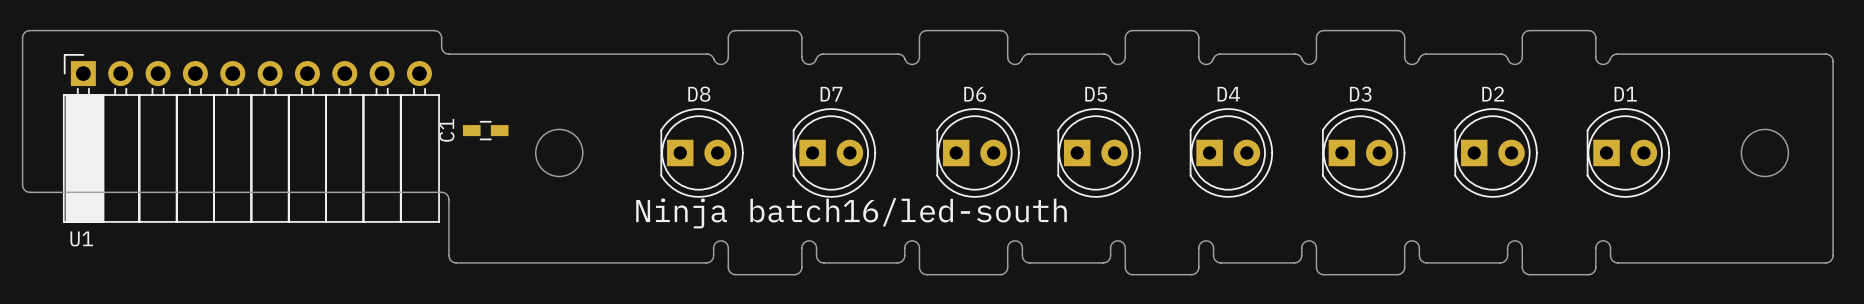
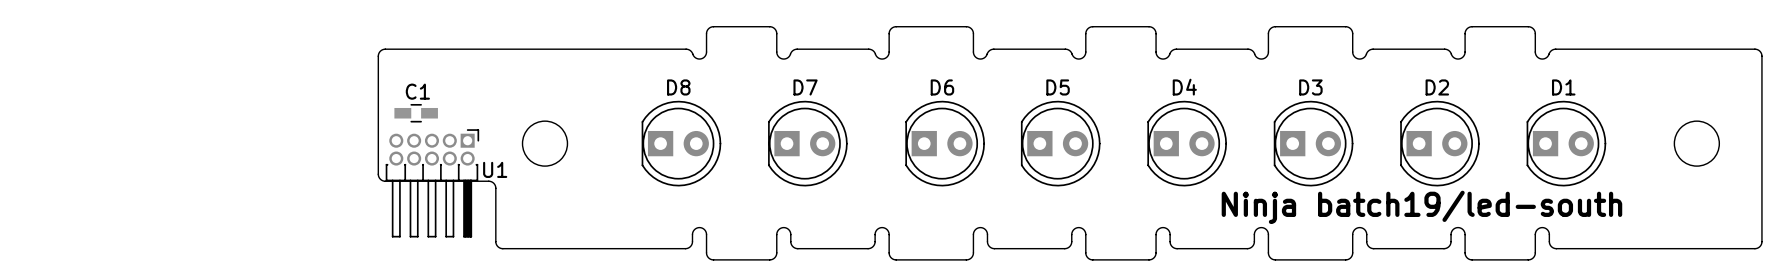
U1 footprint: [62, 54, 440, 223] -> [385, 129, 480, 238]
board edge: (448, 54) (442, 50) (441, 35) (434, 30) (29, 30) (23, 35) (22, 184) (27, 191) (392, 192) -> (439, 49) (384, 49) (378, 53) (378, 174) (380, 179) (385, 181)
C1 name rotation: 0° (446, 130) -> 90° clockwise (417, 91)
C1 name position: C1 (446, 130) -> C1 (417, 91)
C1 position: (485, 130) -> (416, 113)
board edge: (441, 192) (446, 193) (448, 198) (448, 255) (451, 260) (456, 262) (515, 262) -> (432, 181) (488, 181) (493, 183) (495, 188) (495, 242) (497, 246) (502, 248)
text: Ninja batch16/led-south (851, 213) -> none
text: none -> Ninja batch19/led-south (1421, 207)
U1 name position: U1 (81, 238) -> U1 (495, 169)

